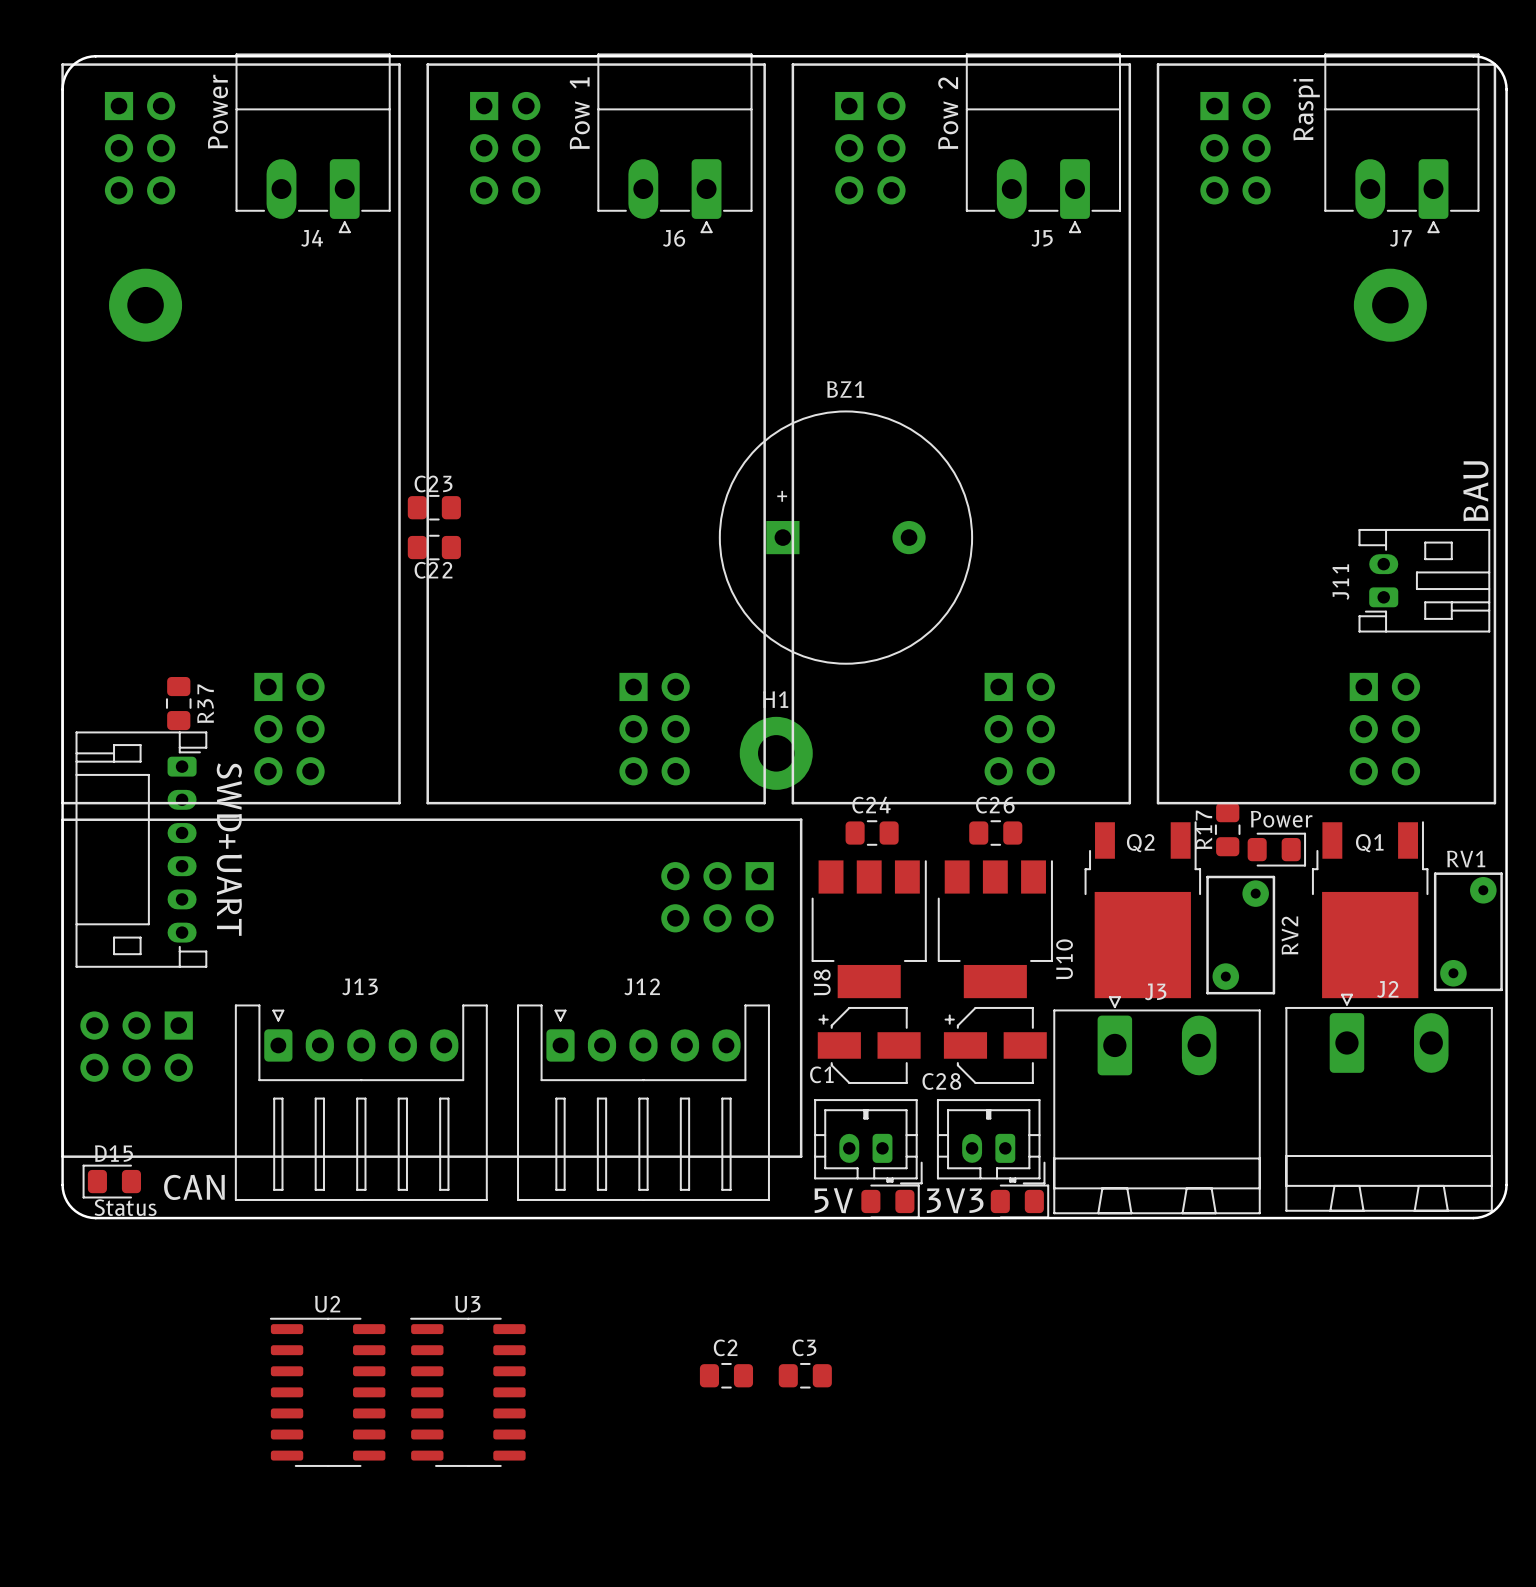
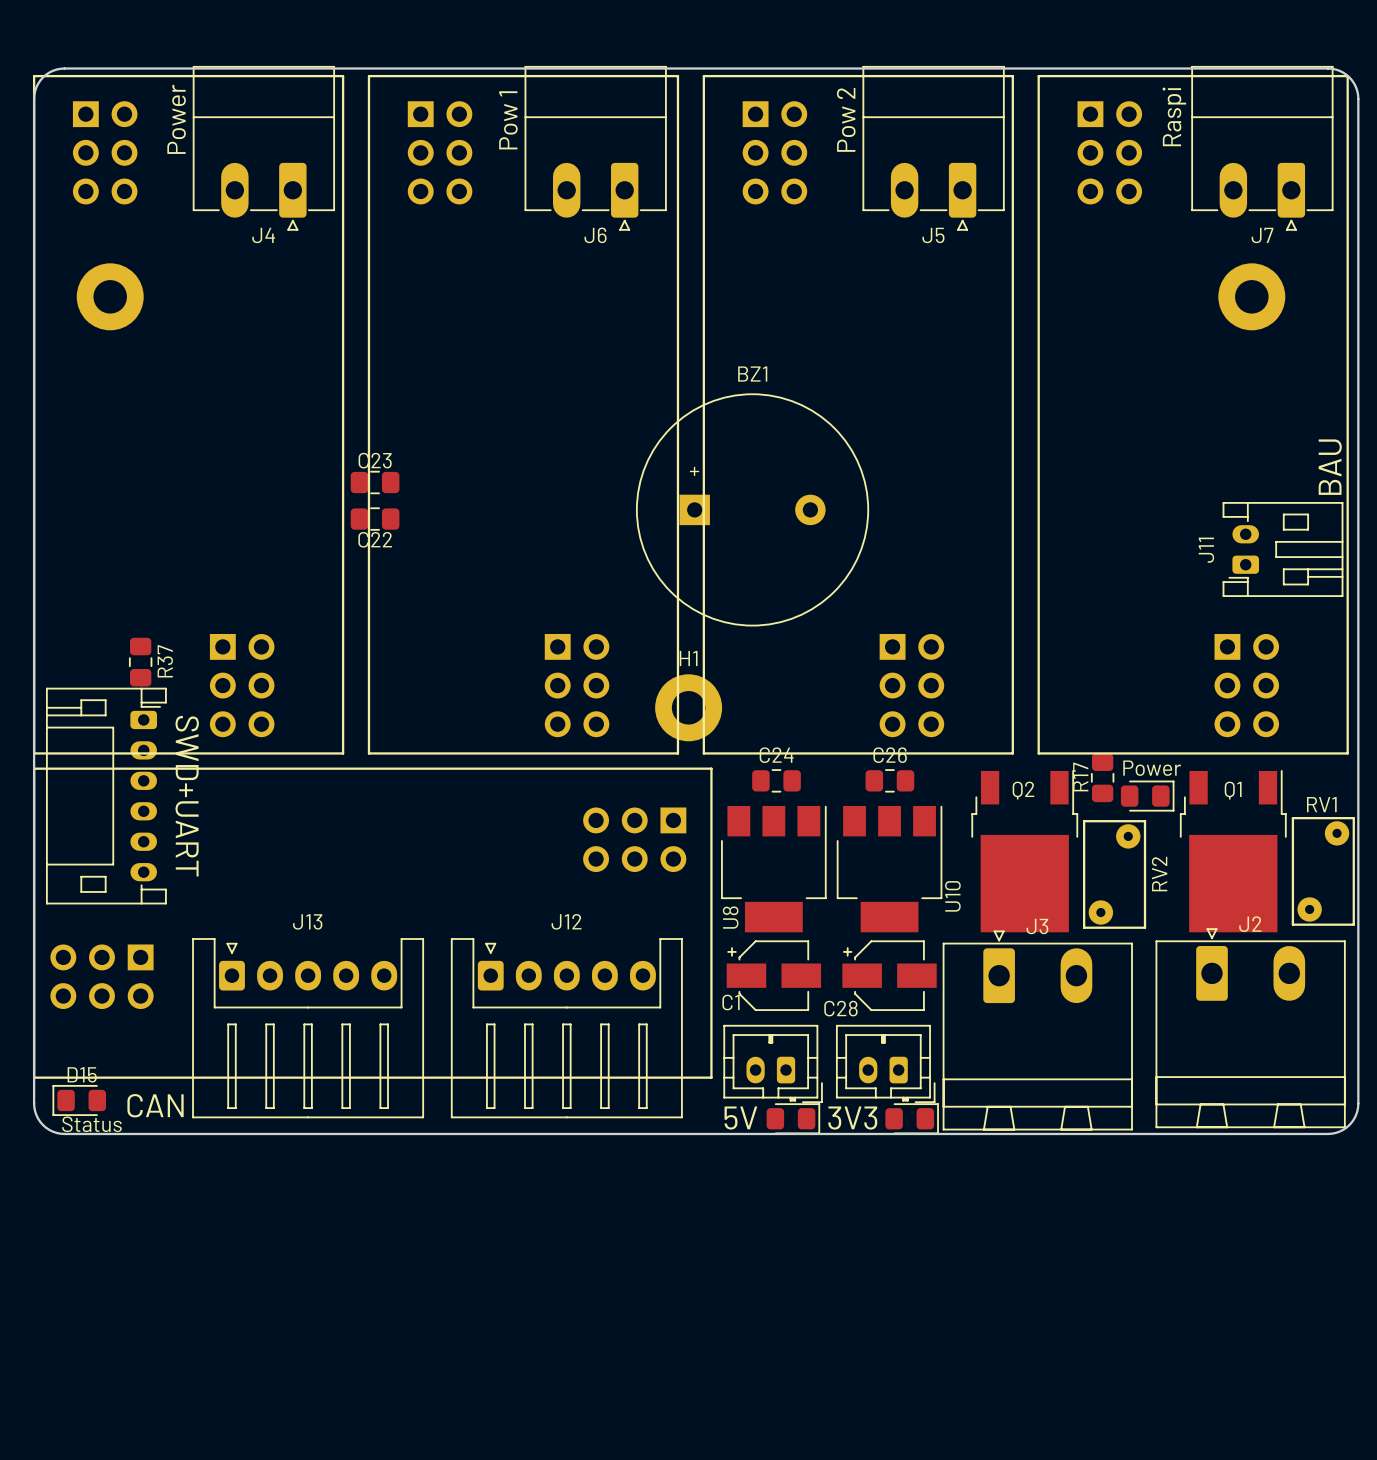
C2: (726, 1375) -> none
C3: (805, 1375) -> none
U2: (327, 1392) -> none
U3: (467, 1392) -> none

